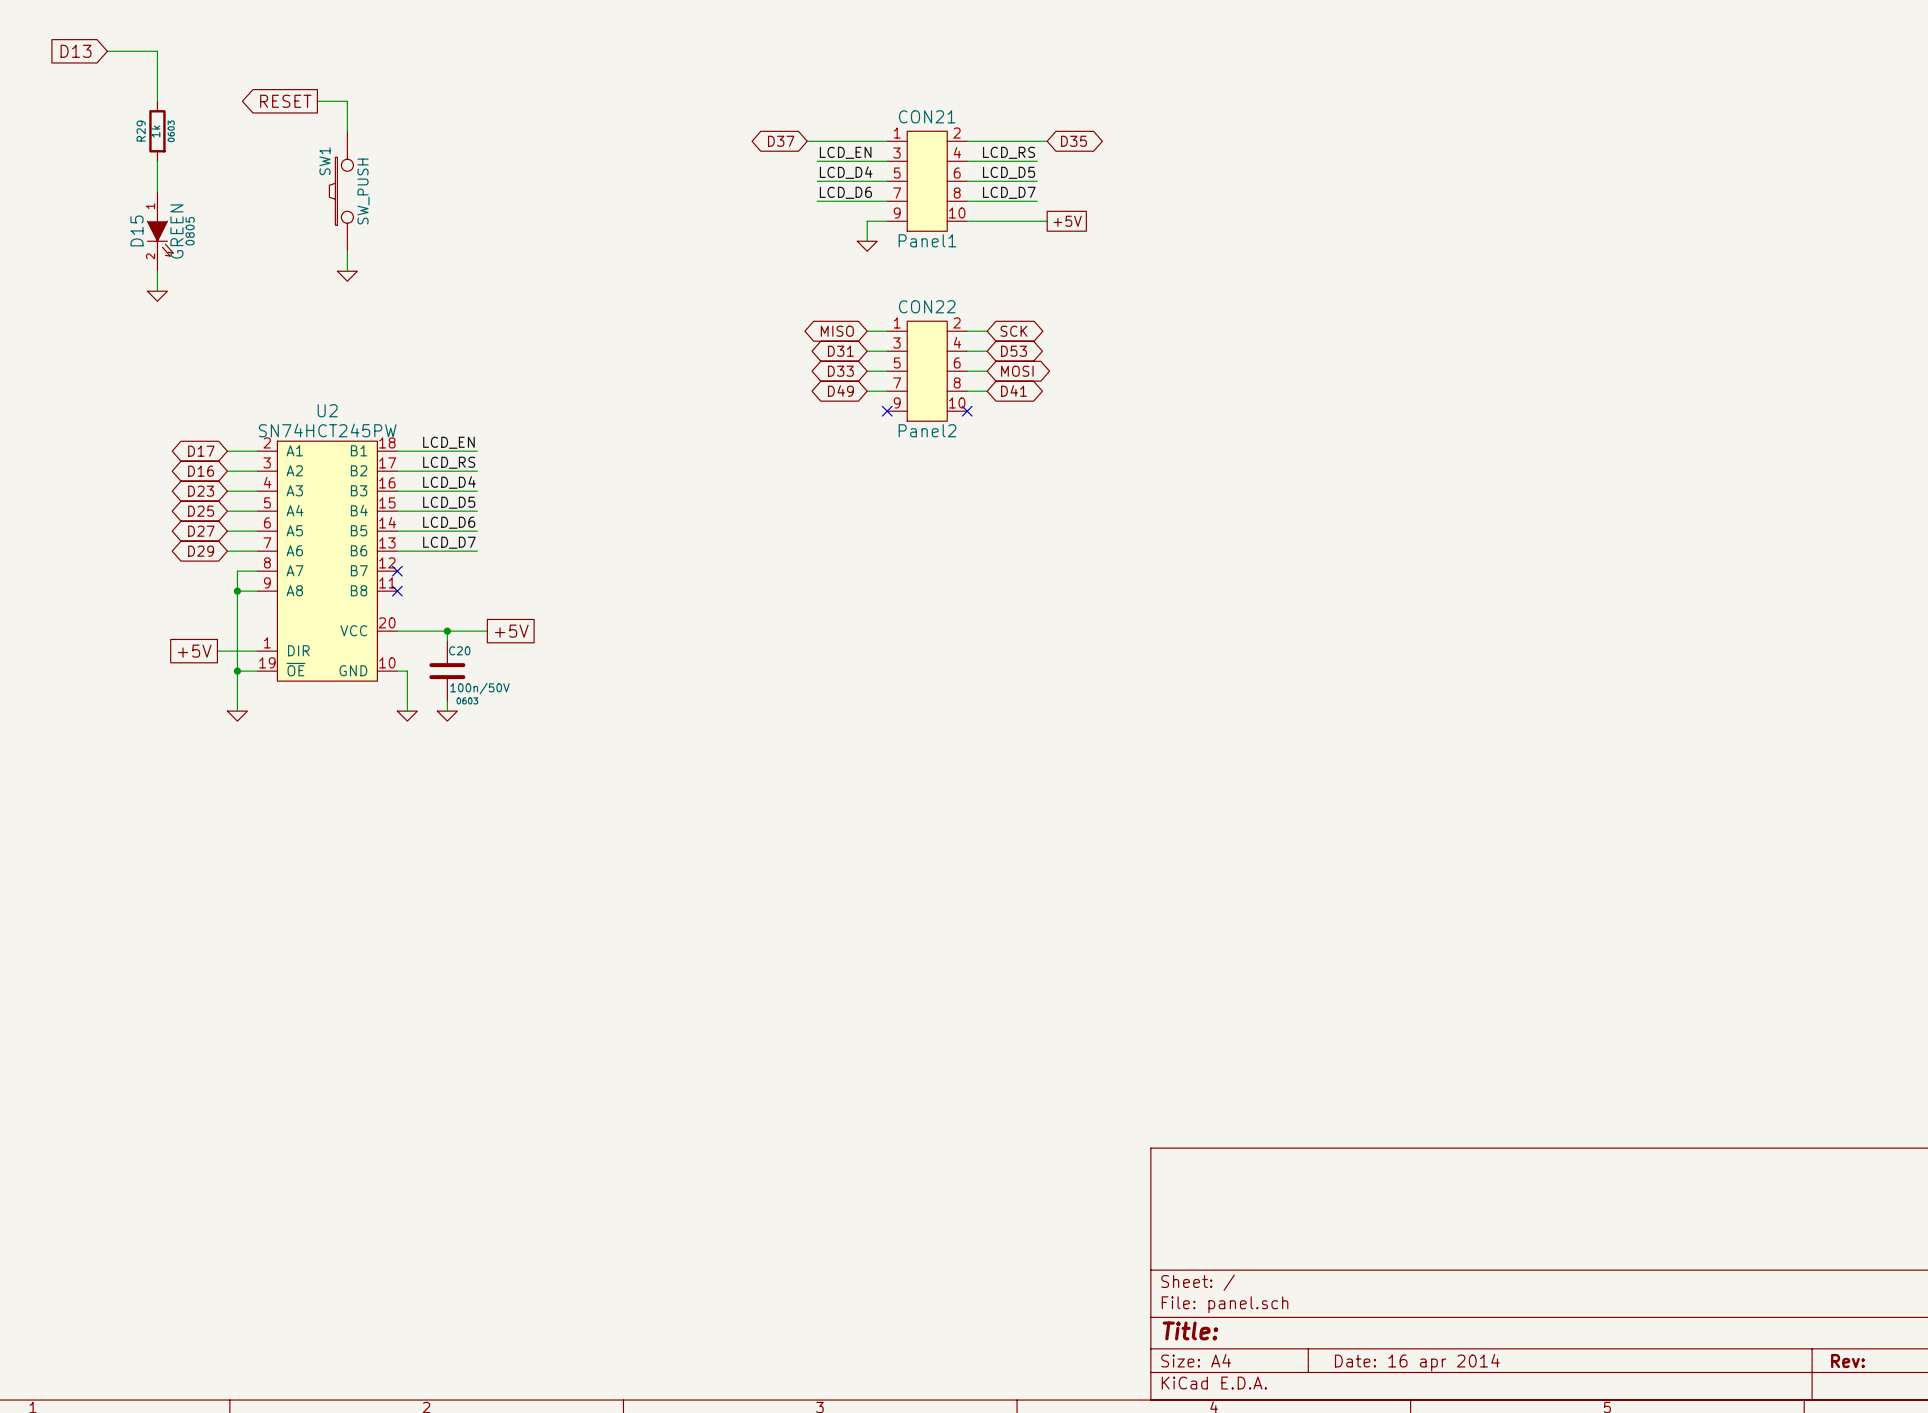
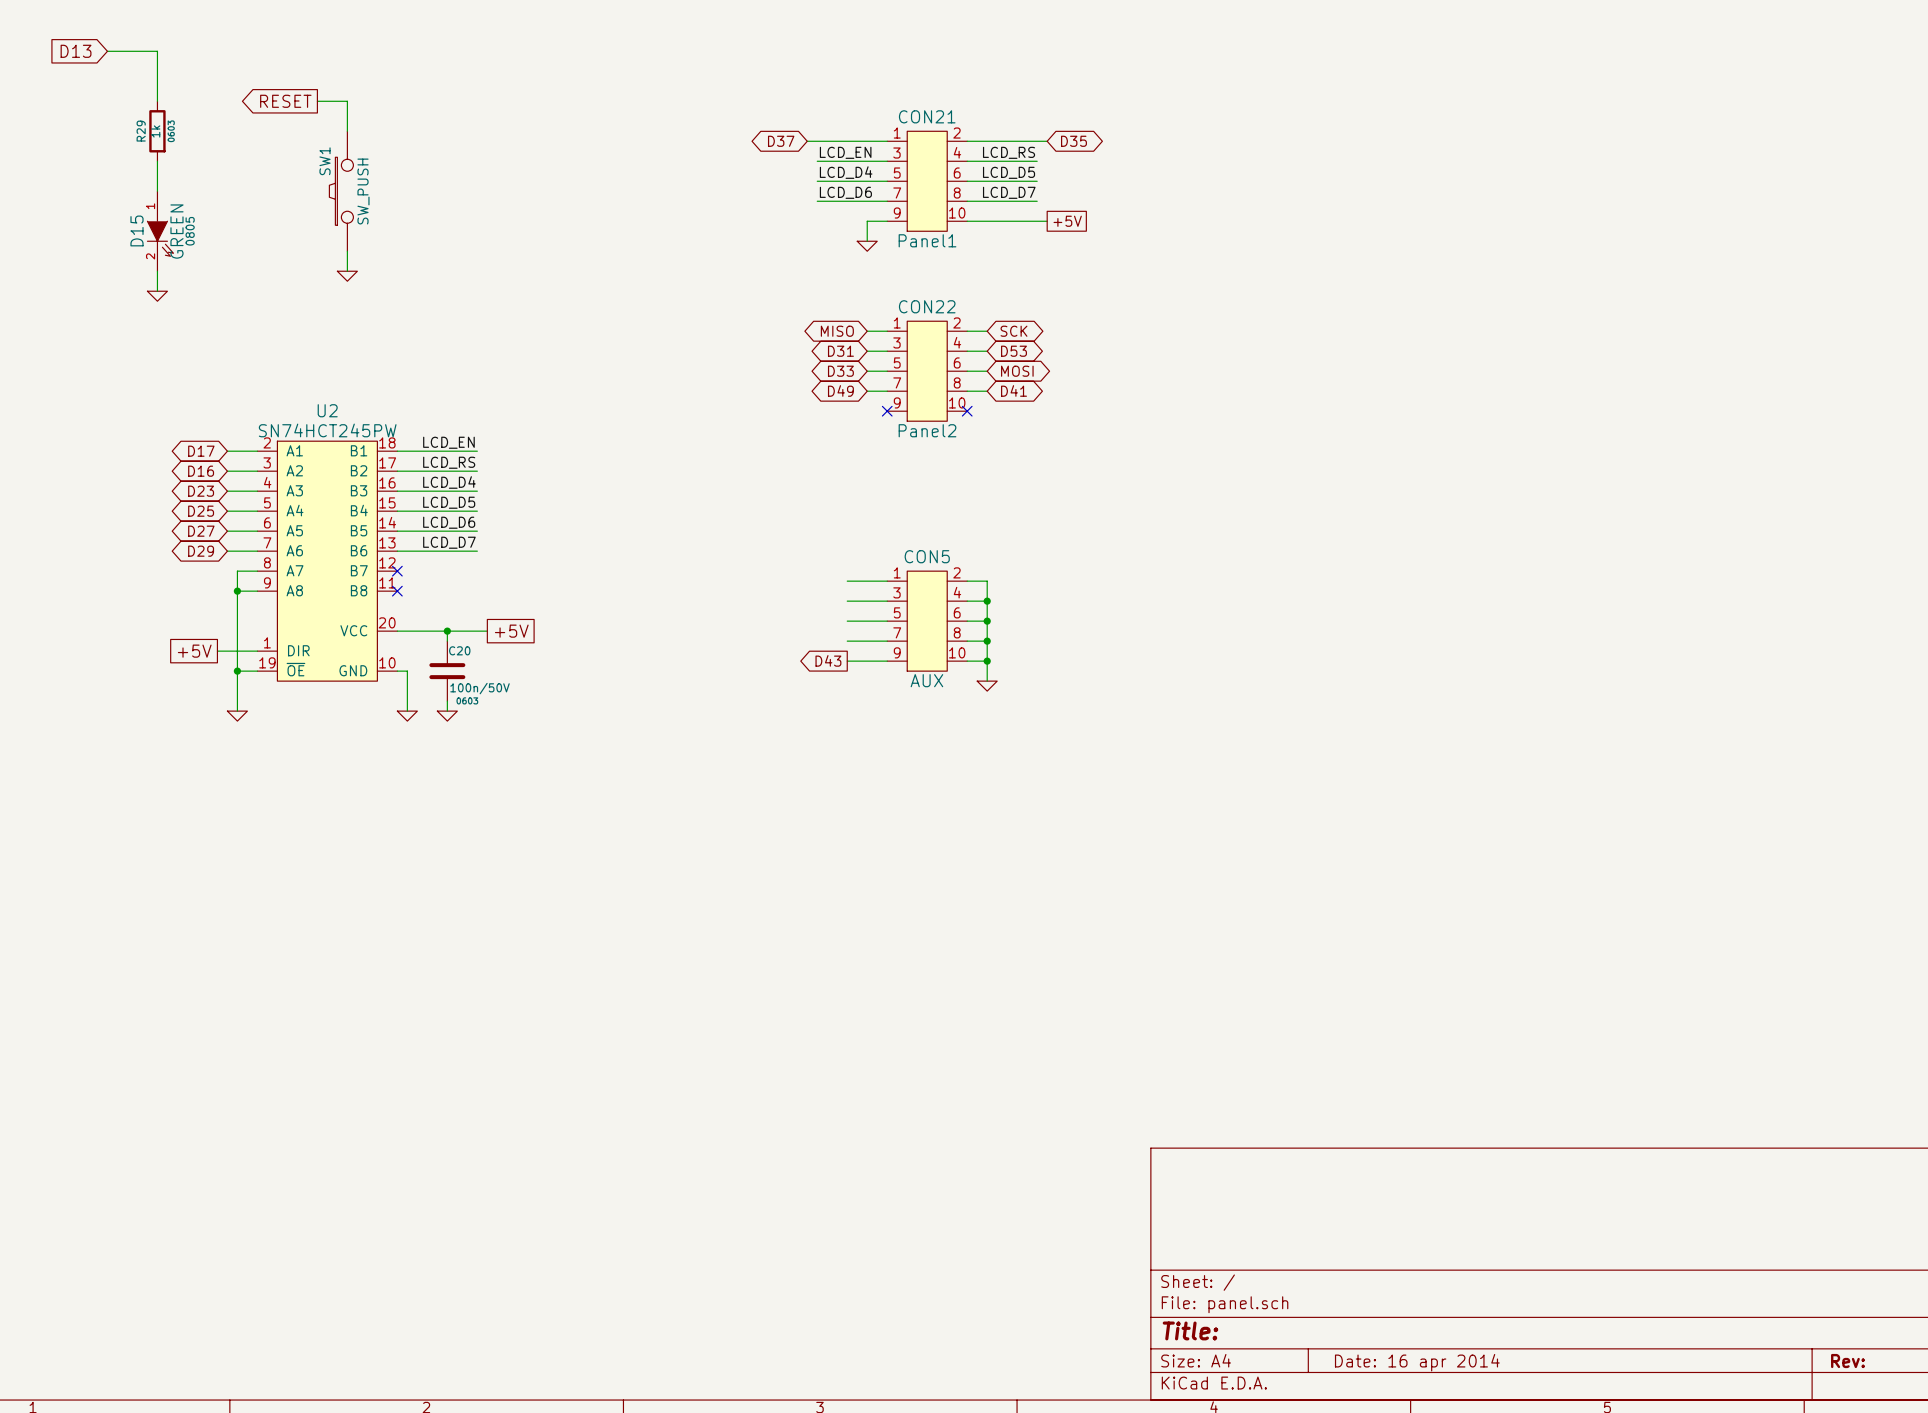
wire: none -> (847, 581) (887, 581)
wire: none -> (967, 581) (987, 581) (987, 681)
wire: none -> (847, 601) (887, 601)
wire: none -> (967, 601) (987, 601)
junction: none -> (987, 601)
wire: none -> (847, 621) (887, 621)
CON5: none -> AUX (927, 621)
wire: none -> (967, 621) (987, 621)
junction: none -> (987, 621)
wire: none -> (847, 641) (887, 641)
wire: none -> (967, 641) (987, 641)
junction: none -> (987, 641)
global label: none -> D43 (828, 660)
wire: none -> (847, 661) (887, 661)
wire: none -> (967, 661) (987, 661)
junction: none -> (987, 661)
power symbol: none -> (987, 686)

